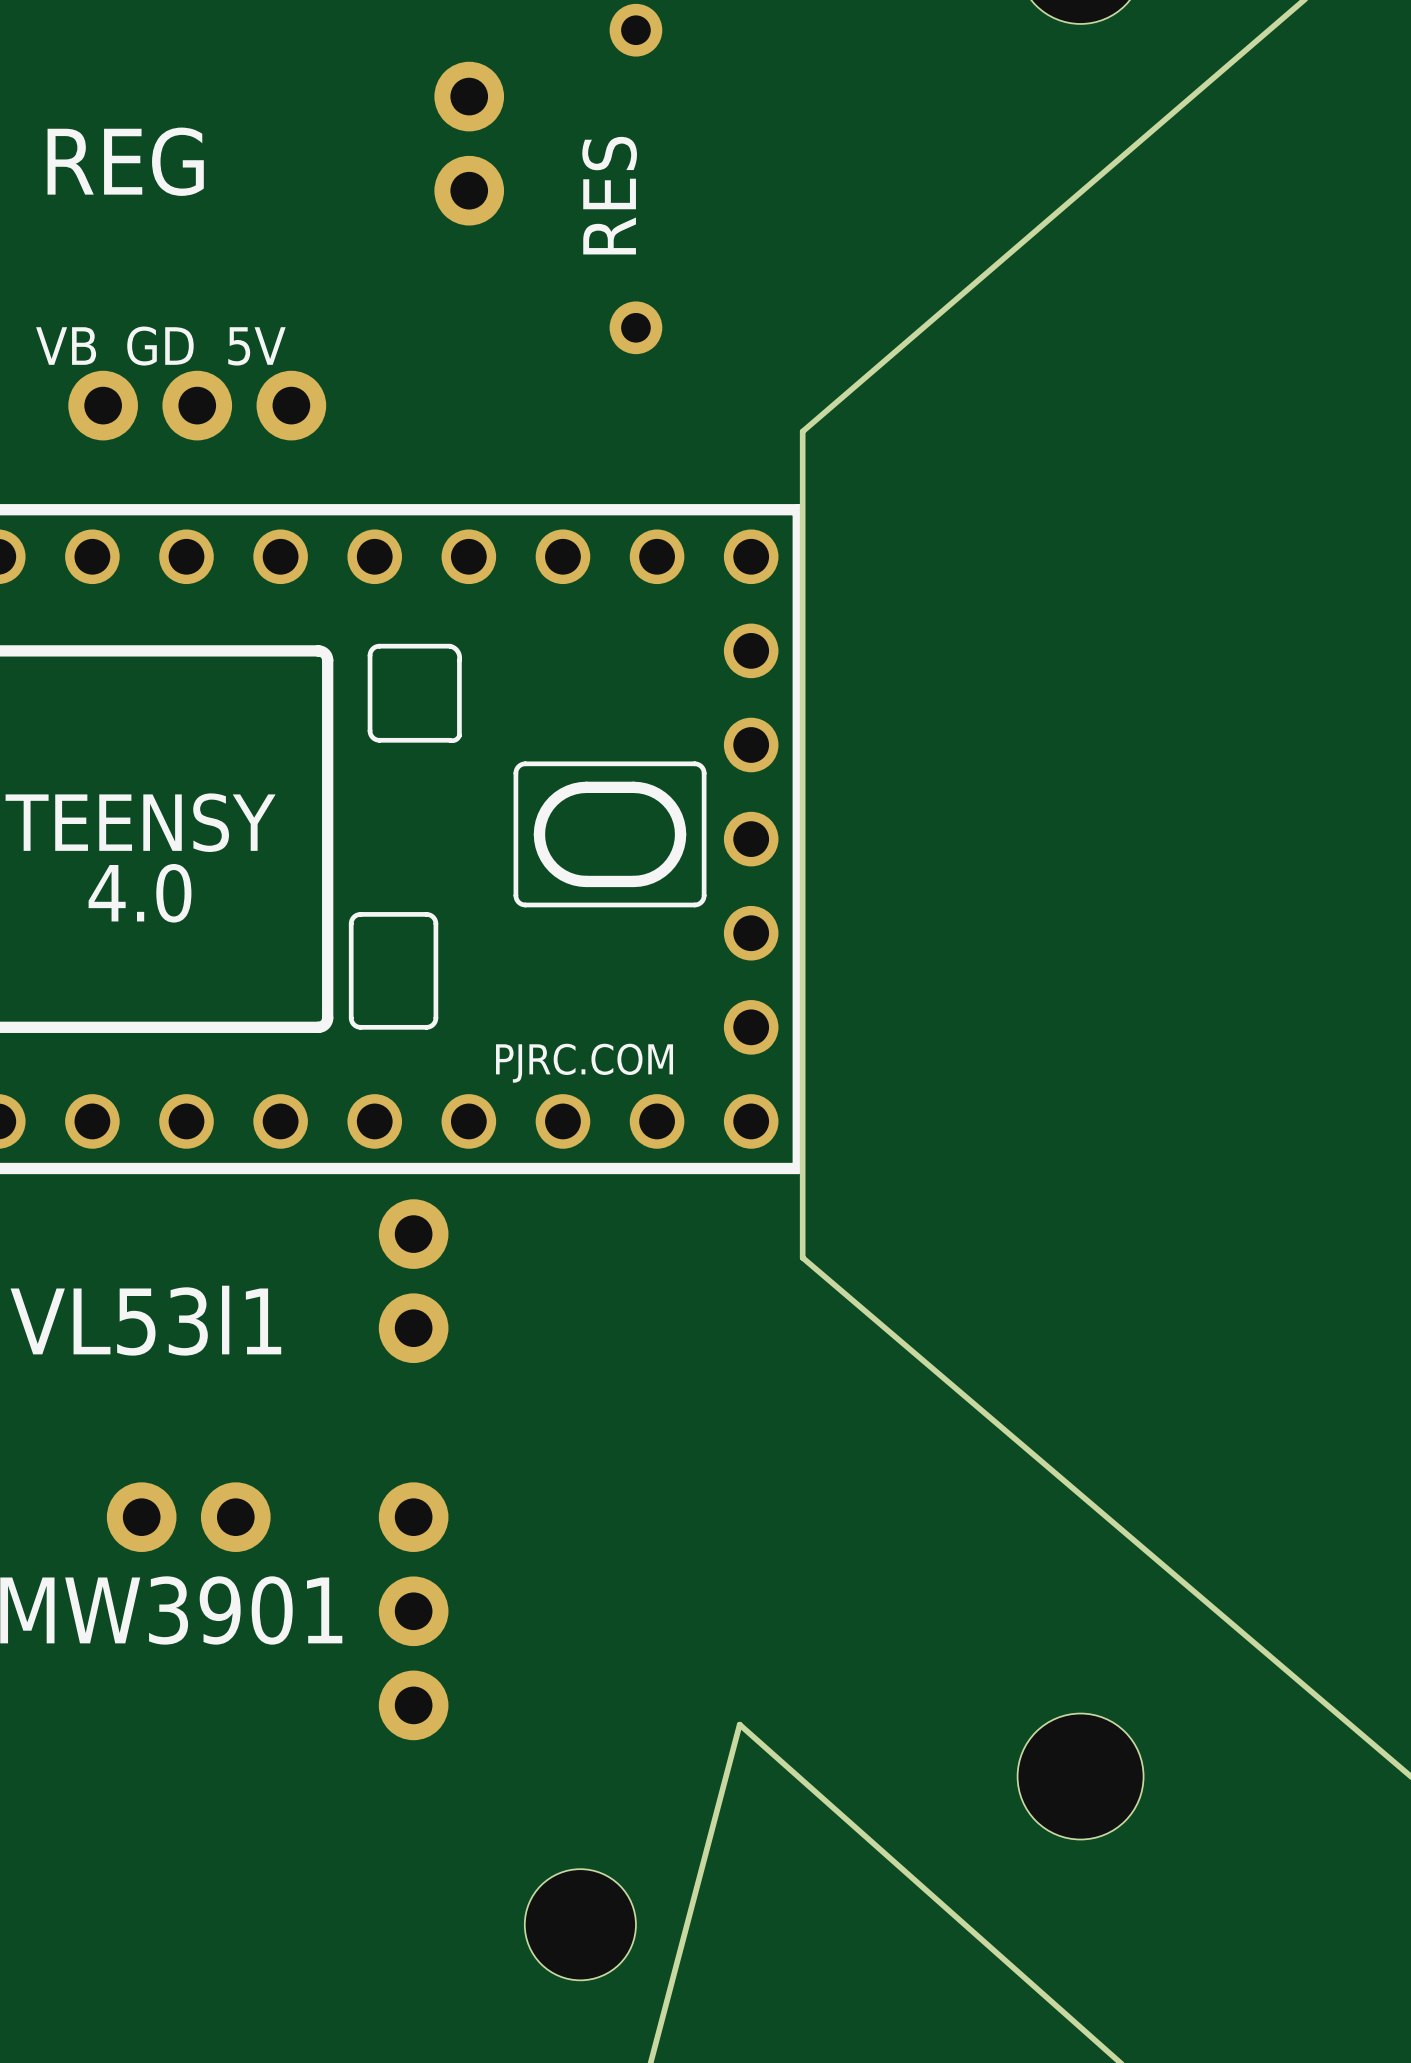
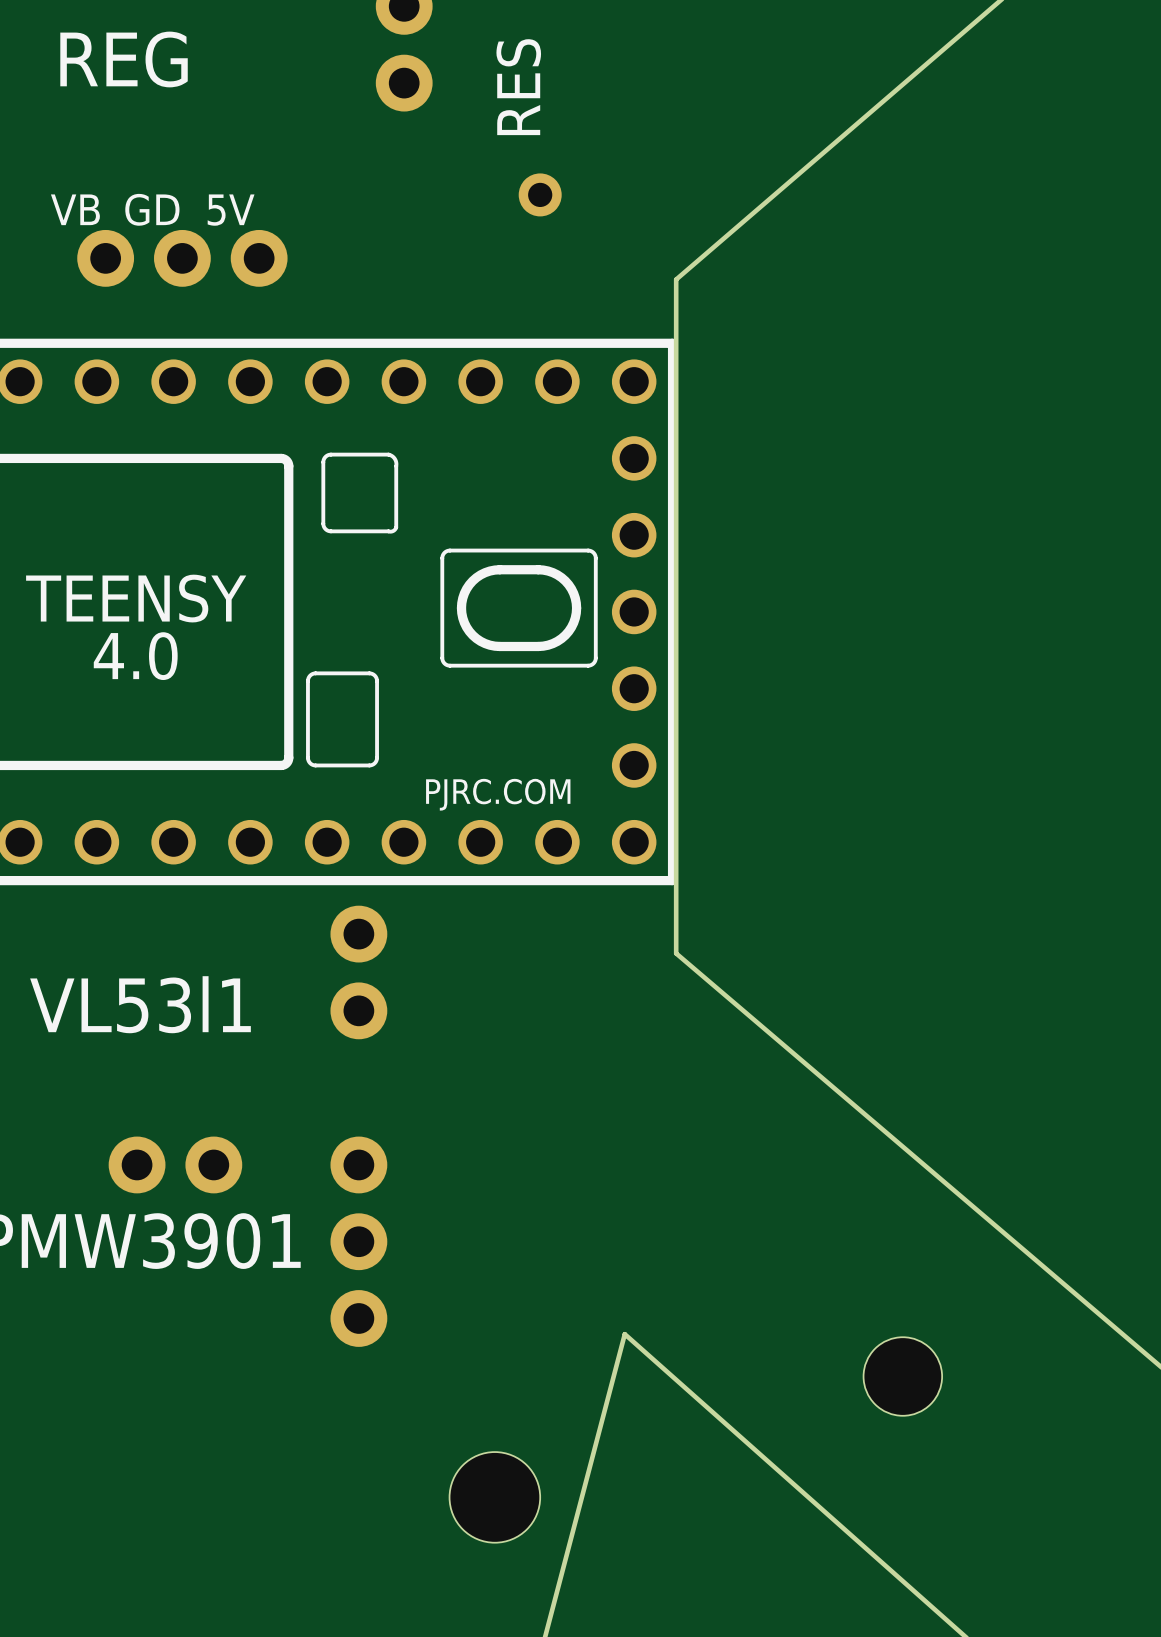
hole size: [1017, 1713, 1144, 1840] -> [863, 1337, 943, 1416]

